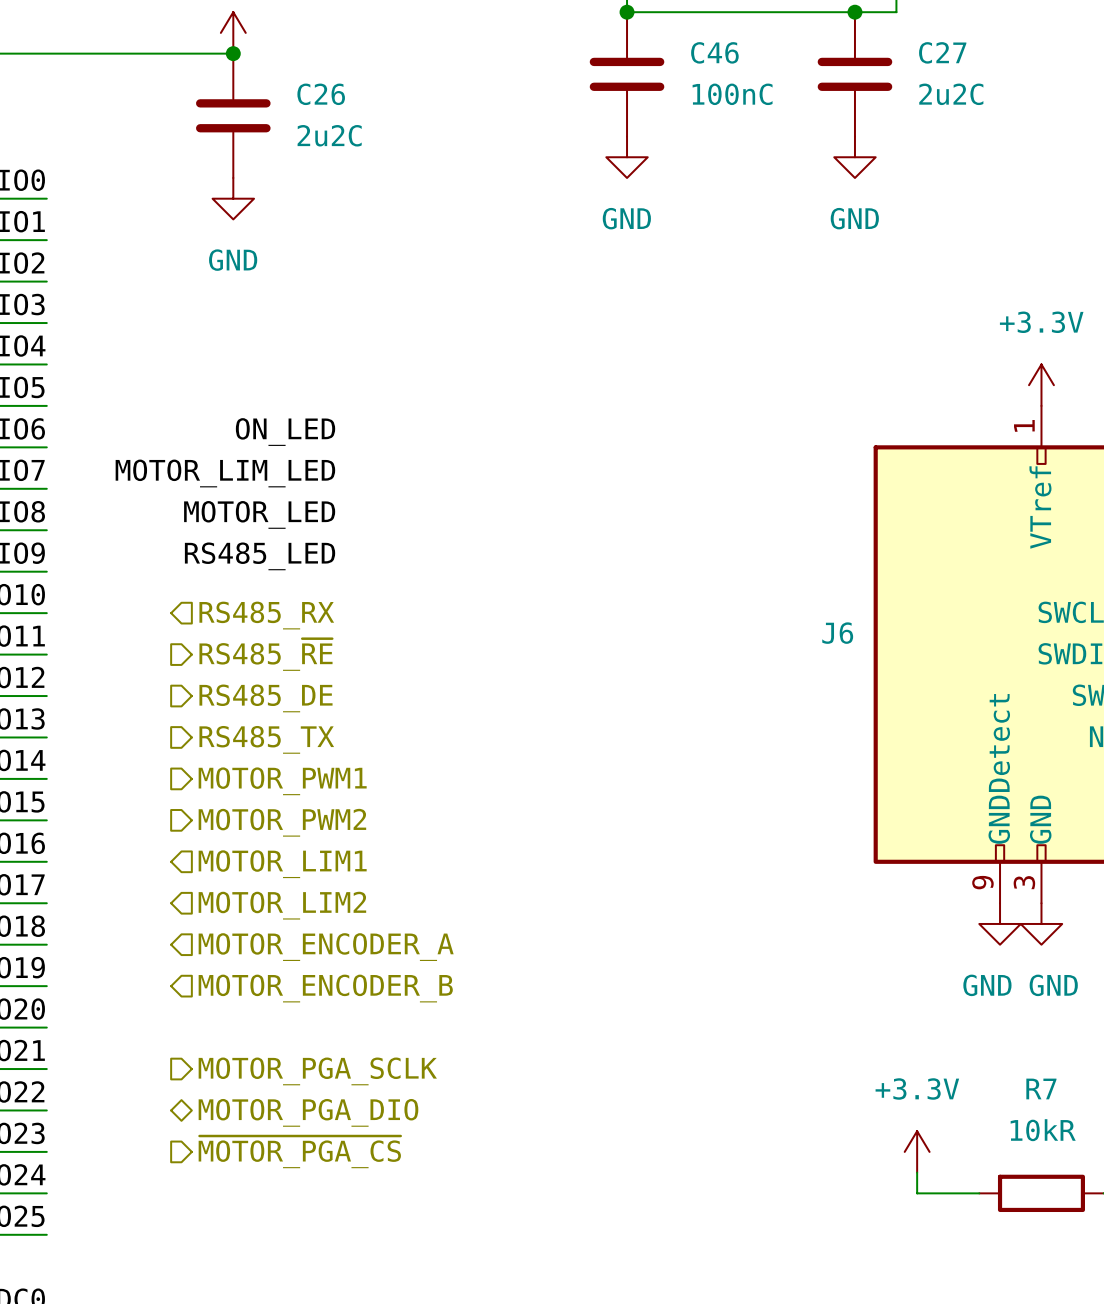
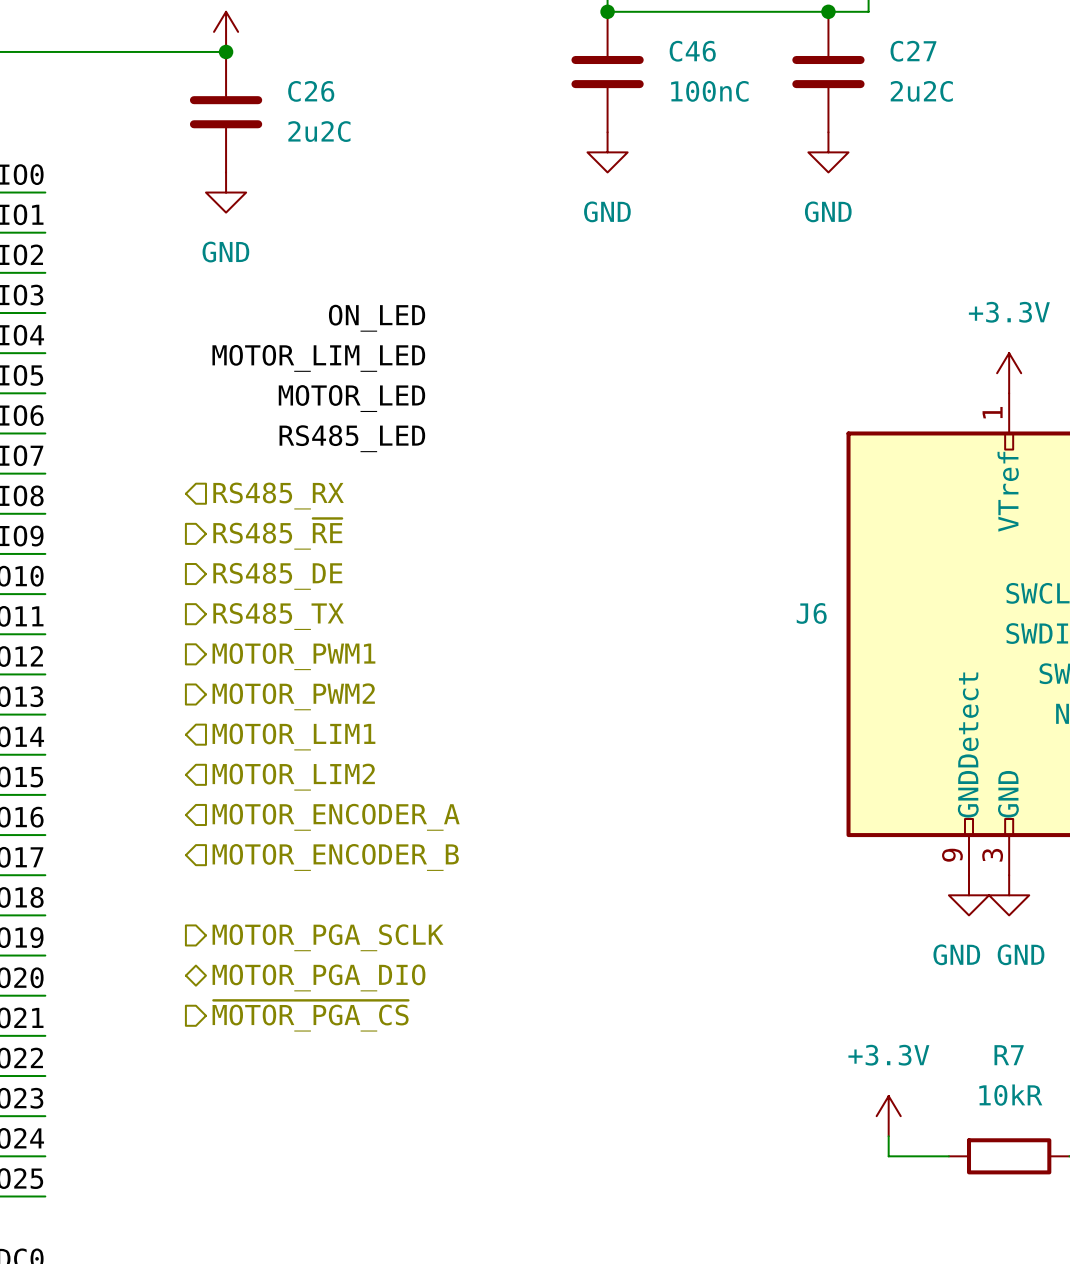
label position: ON_LED (285, 432) -> ON_LED (377, 318)
label position: MOTOR_LIM_LED (225, 473) -> MOTOR_LIM_LED (318, 358)
label position: MOTOR_LED (259, 514) -> MOTOR_LED (351, 398)
label position: RS485_LED (260, 556) -> RS485_LED (352, 438)
hierarchical label position: RS485_RX (266, 615) -> RS485_RX (278, 496)
hierarchical label position: RS485_~{RE} (265, 654) -> RS485_~{RE} (277, 534)
hierarchical label position: RS485_DE (265, 698) -> RS485_DE (277, 576)
hierarchical label position: RS485_TX (266, 739) -> RS485_TX (278, 616)
hierarchical label position: MOTOR_PWM1 (282, 781) -> MOTOR_PWM1 (293, 656)
hierarchical label position: MOTOR_PWM2 (282, 822) -> MOTOR_PWM2 (293, 696)
hierarchical label position: MOTOR_LIM1 (282, 864) -> MOTOR_LIM1 (293, 736)
hierarchical label position: MOTOR_LIM2 (282, 905) -> MOTOR_LIM2 (293, 777)
hierarchical label position: MOTOR_ENCODER_A (326, 947) -> MOTOR_ENCODER_A (336, 817)
hierarchical label position: MOTOR_ENCODER_B (325, 988) -> MOTOR_ENCODER_B (335, 857)
hierarchical label position: MOTOR_PGA_SCLK (317, 1071) -> MOTOR_PGA_SCLK (328, 937)
hierarchical label position: MOTOR_PGA_DIO (308, 1112) -> MOTOR_PGA_DIO (318, 977)
hierarchical label position: ~{MOTOR_PGA_CS} (299, 1152) -> ~{MOTOR_PGA_CS} (310, 1015)

